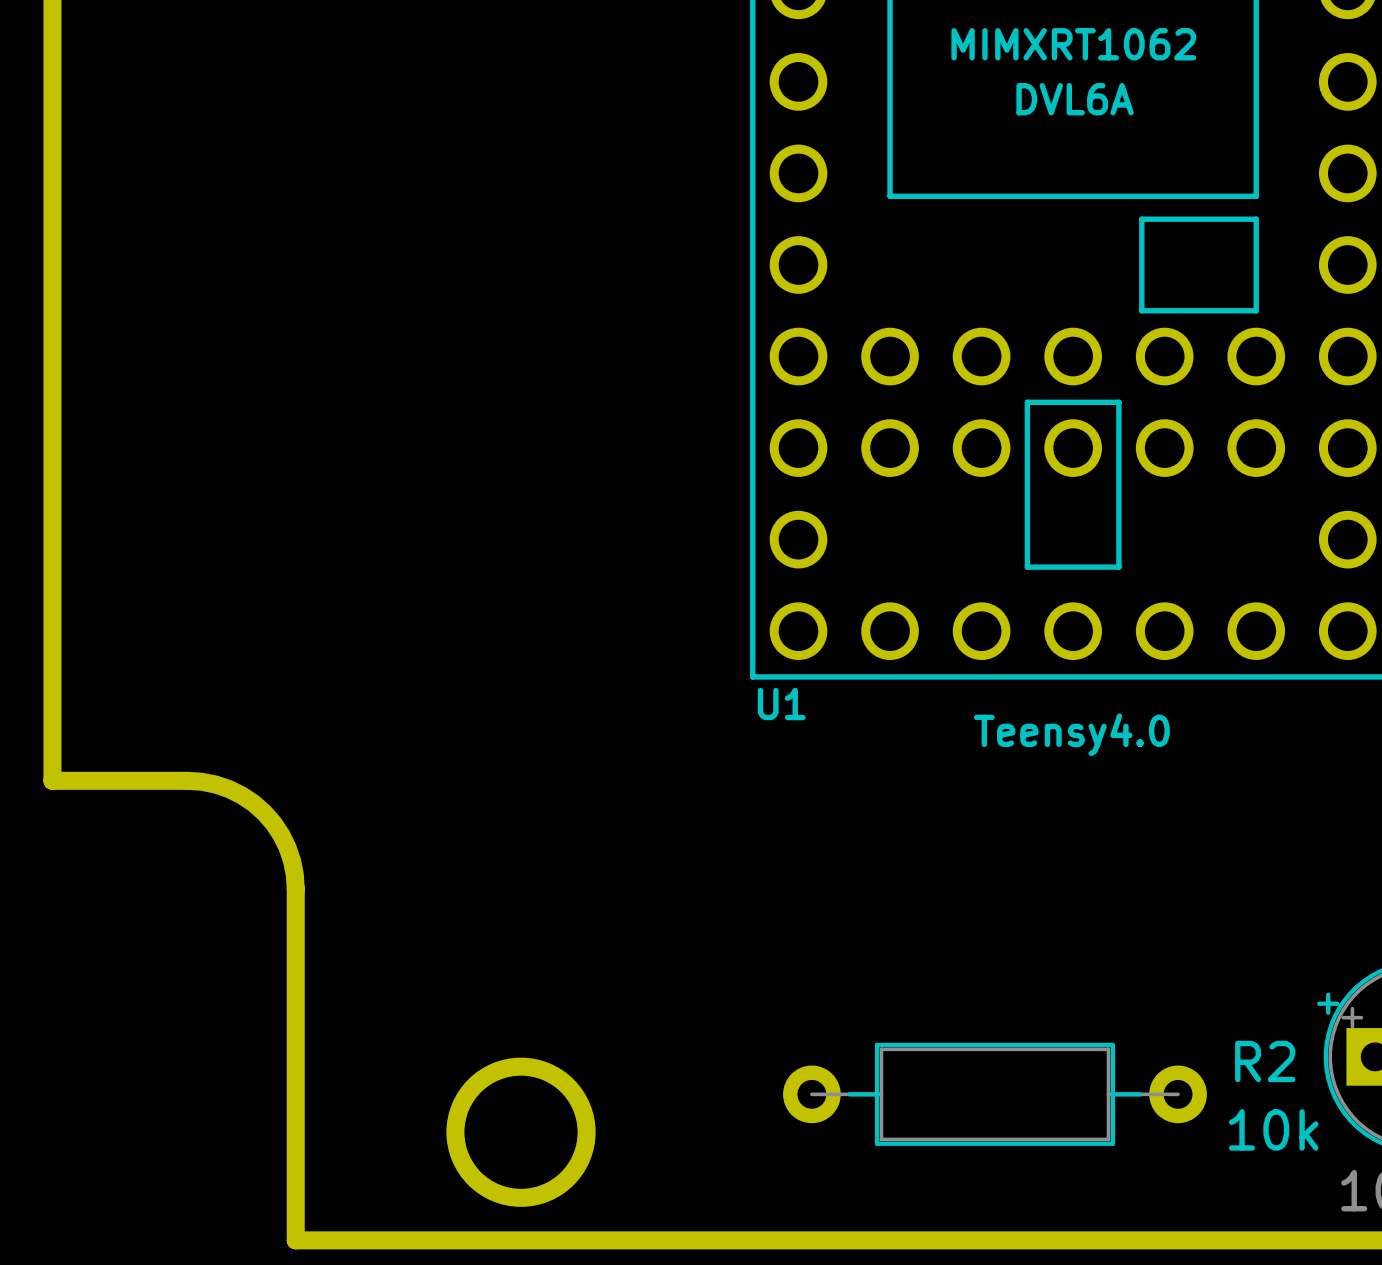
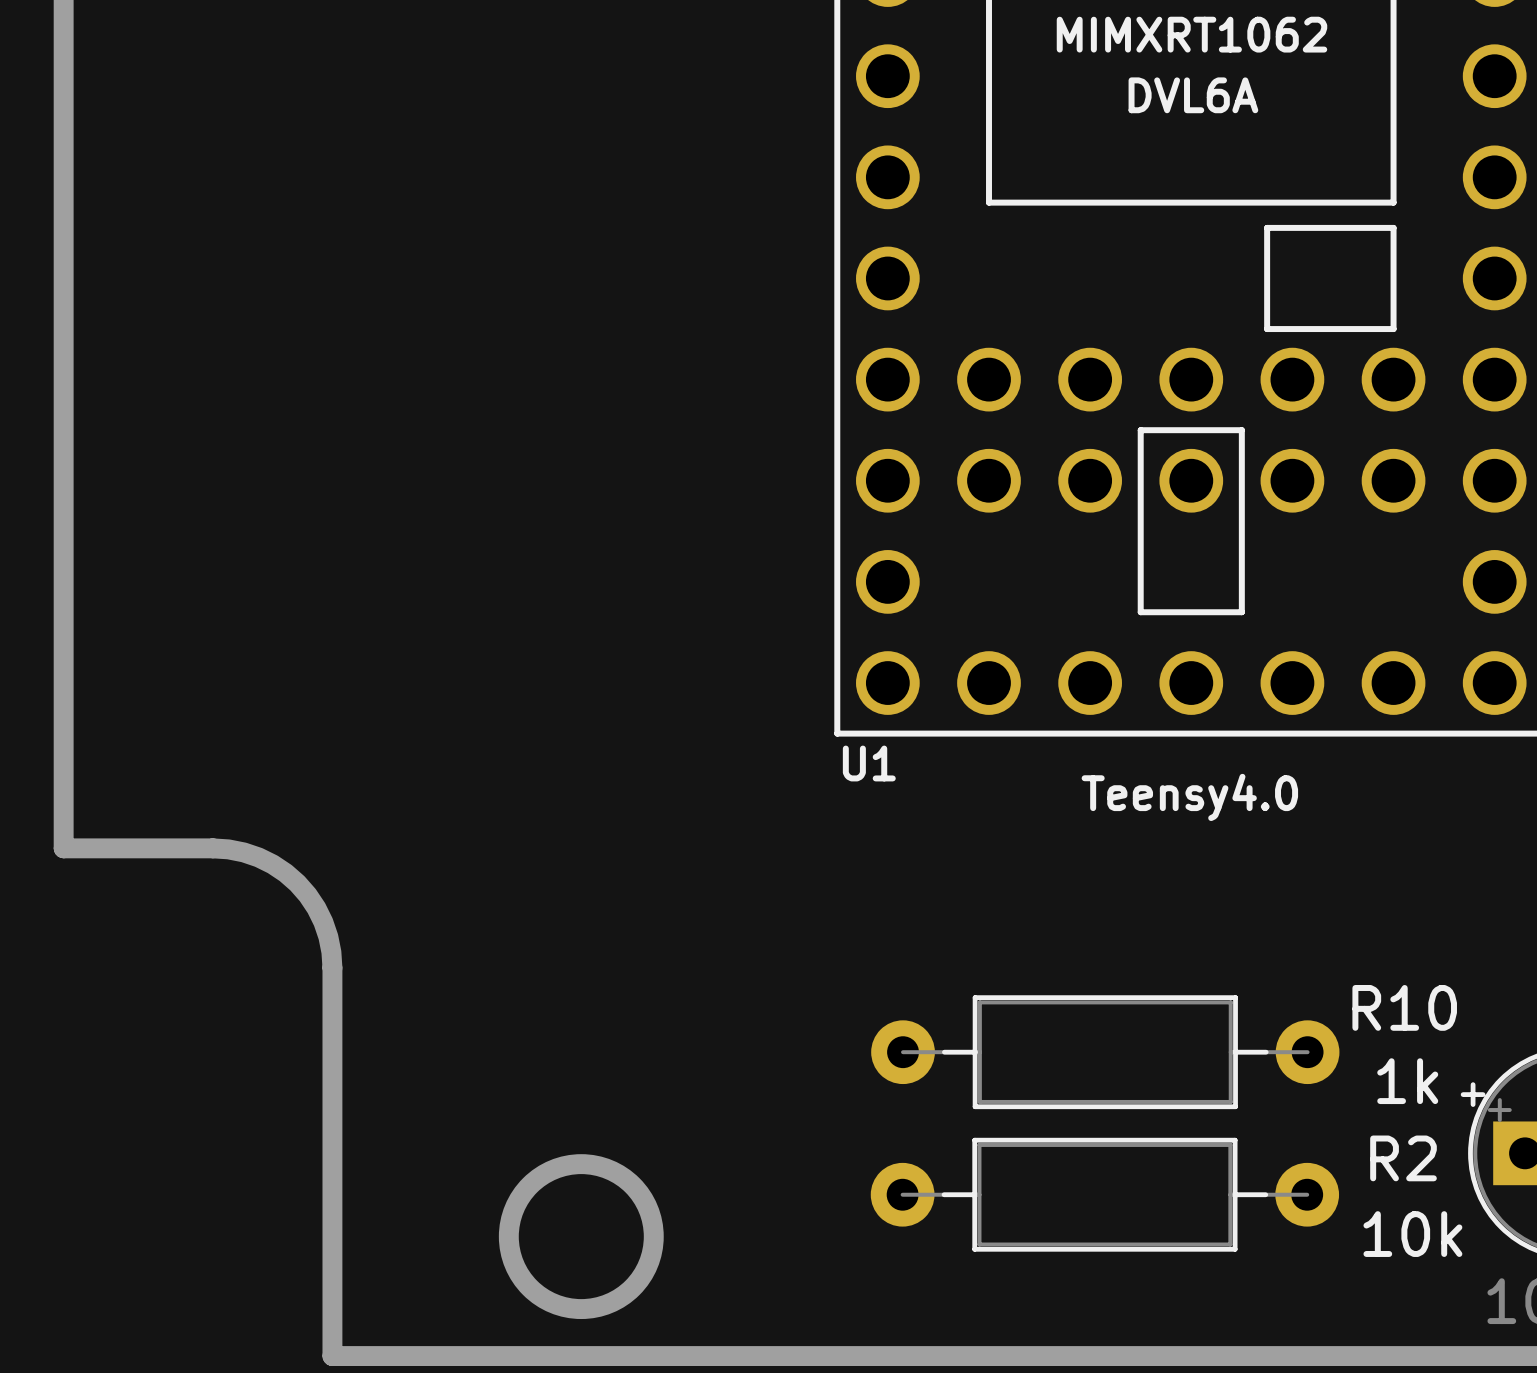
R10: none -> 1k (1105, 1052)

